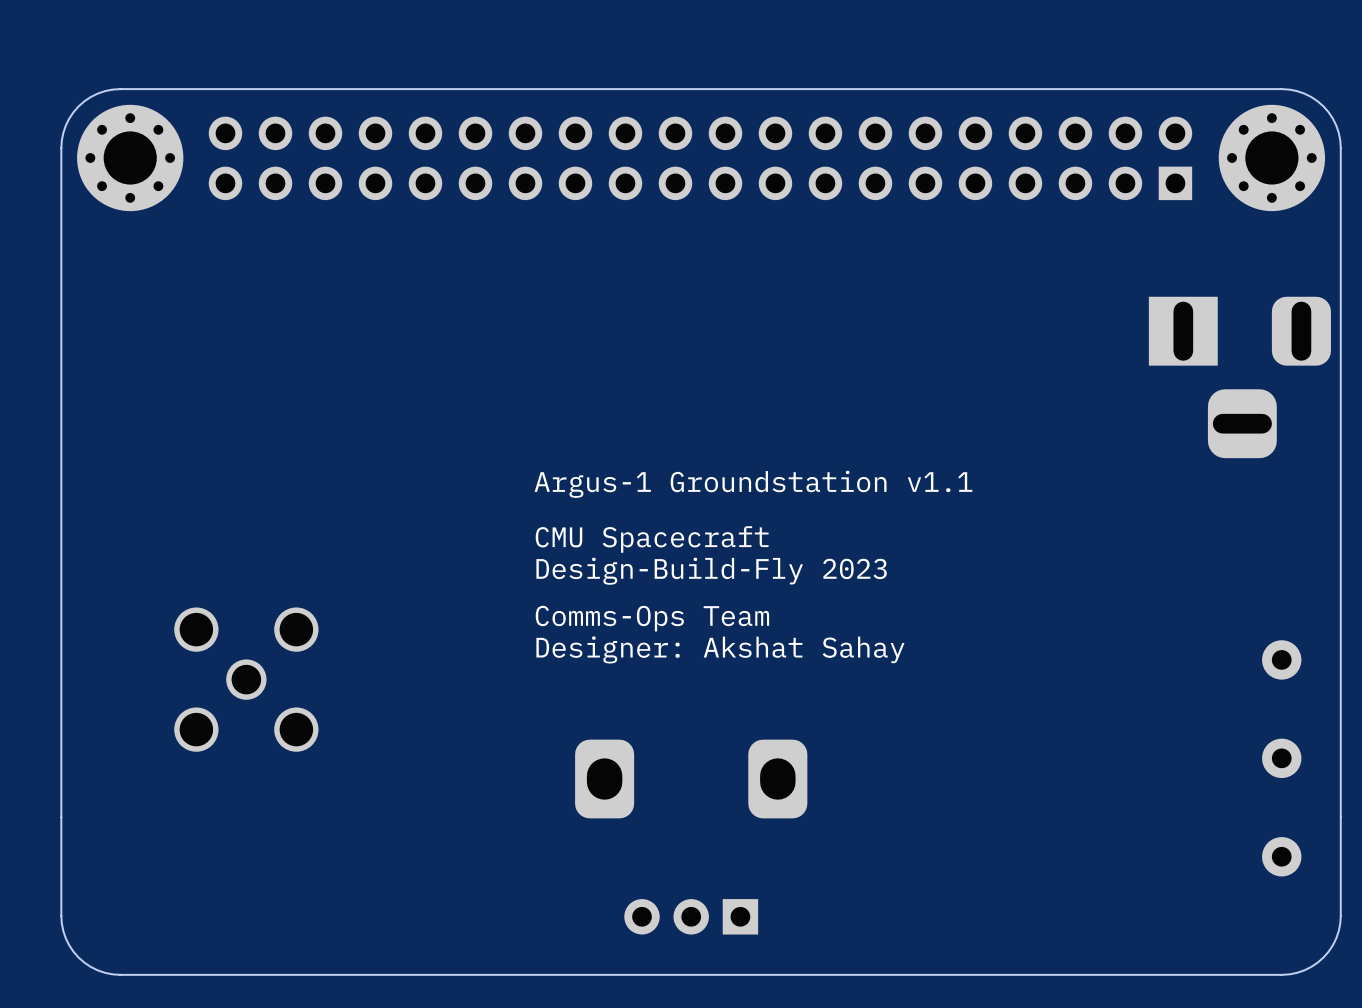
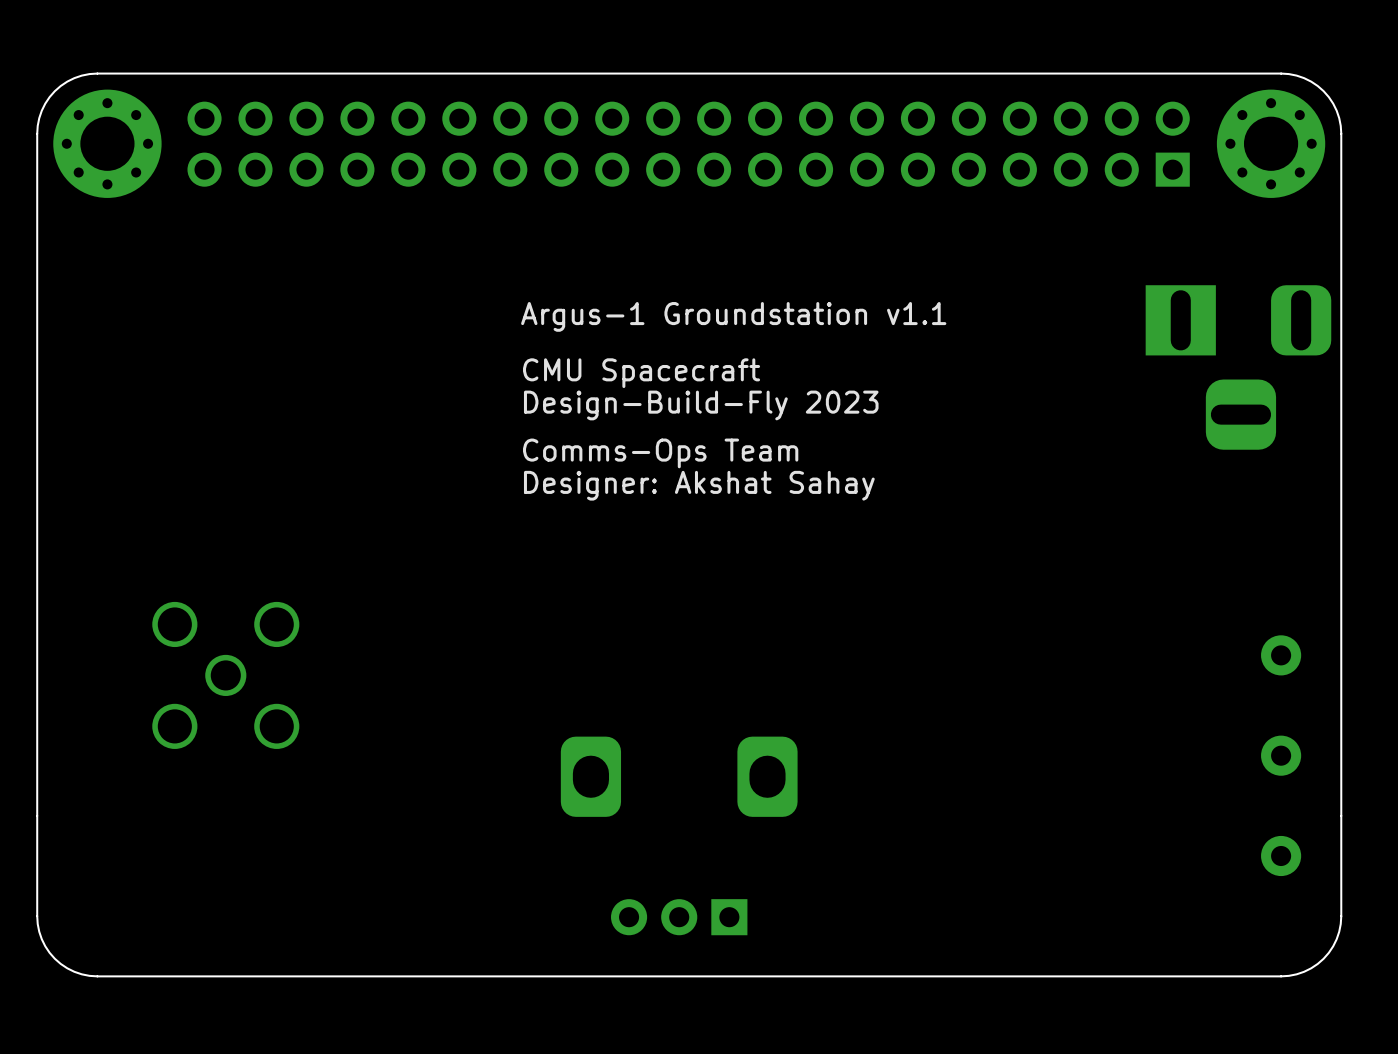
text position: Argus-1 Groundstation v1.1 (753, 484) -> Argus-1 Groundstation v1.1 (733, 316)
text position: CMU Spacecraft (652, 539) -> CMU Spacecraft (641, 373)
text position: Design-Build-Fly 2023 (711, 571) -> Design-Build-Fly 2023 (701, 405)
text position: Comms-Ops Team (652, 618) -> Comms-Ops Team (660, 453)
text position: Designer: Akshat Sahay (720, 649) -> Designer: Akshat Sahay (699, 485)

